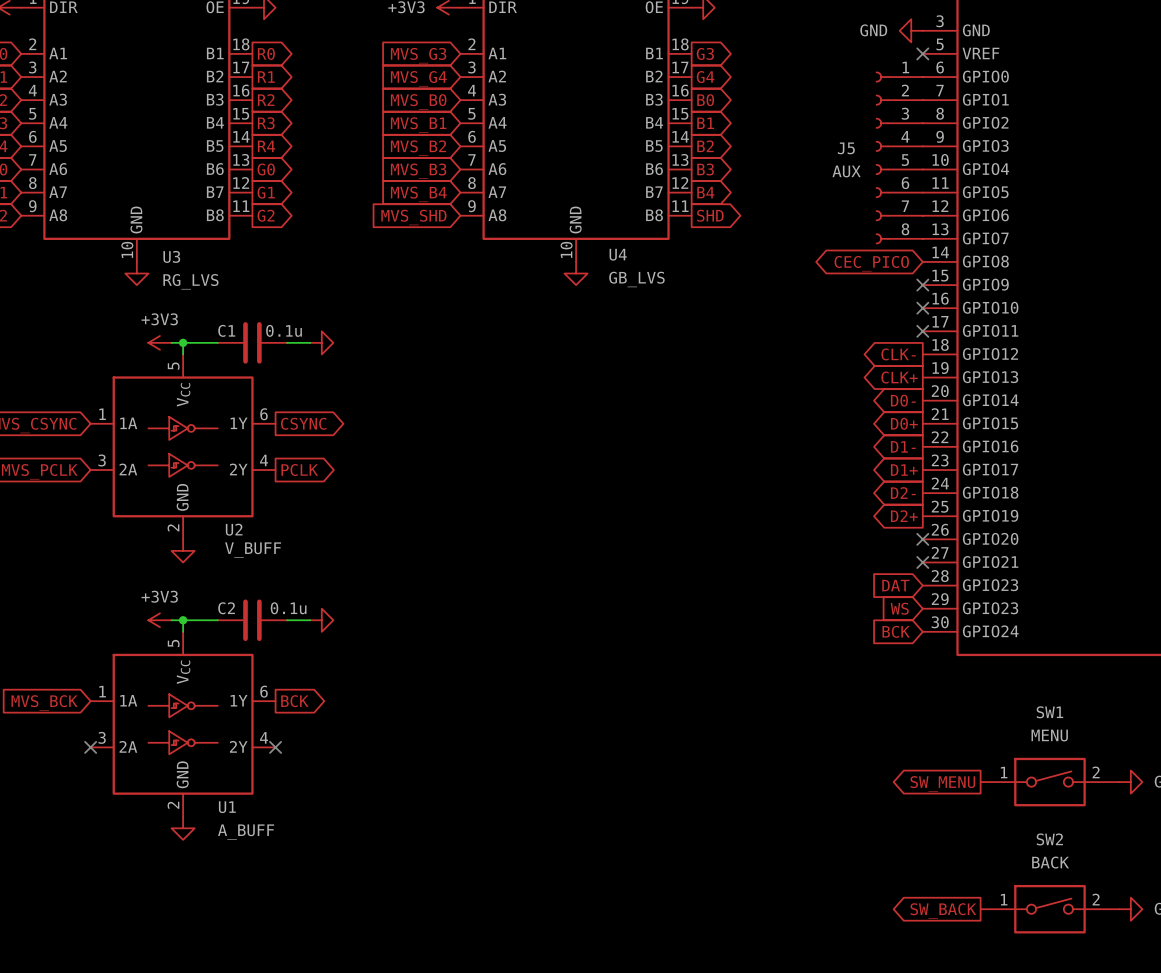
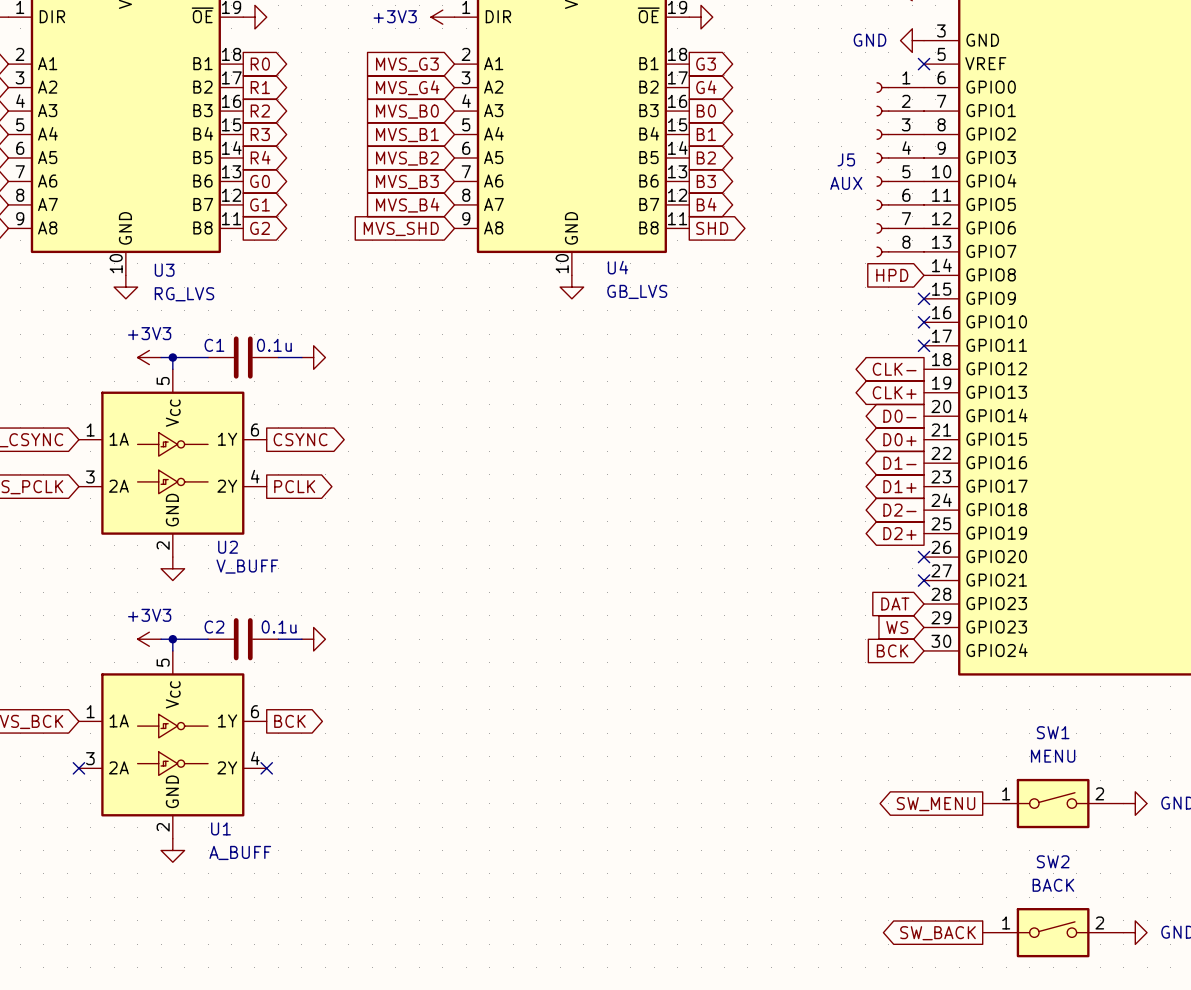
global label shape: bidirectional (871, 263) -> input (892, 275)
global label: CEC_PICO (871, 263) -> HPD (892, 275)

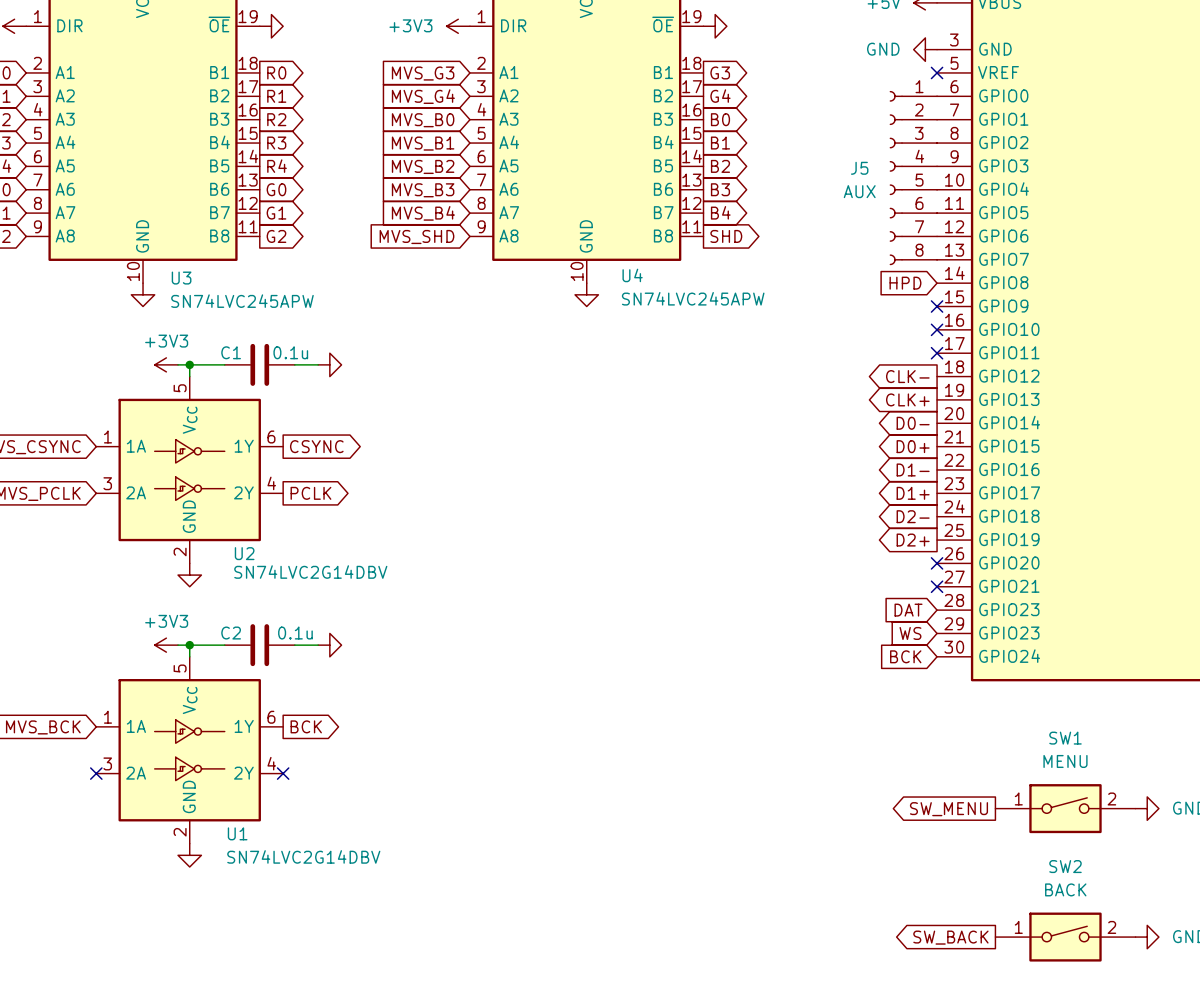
U4 value: GB_LVS (637, 291) -> SN74LVC245APW (693, 298)
U3 value: RG_LVS (184, 294) -> SN74LVC245APW (242, 301)
U2 value: V_BUFF (247, 566) -> SN74LVC2G14DBV (310, 572)
U1 value: A_BUFF (240, 852) -> SN74LVC2G14DBV (303, 856)

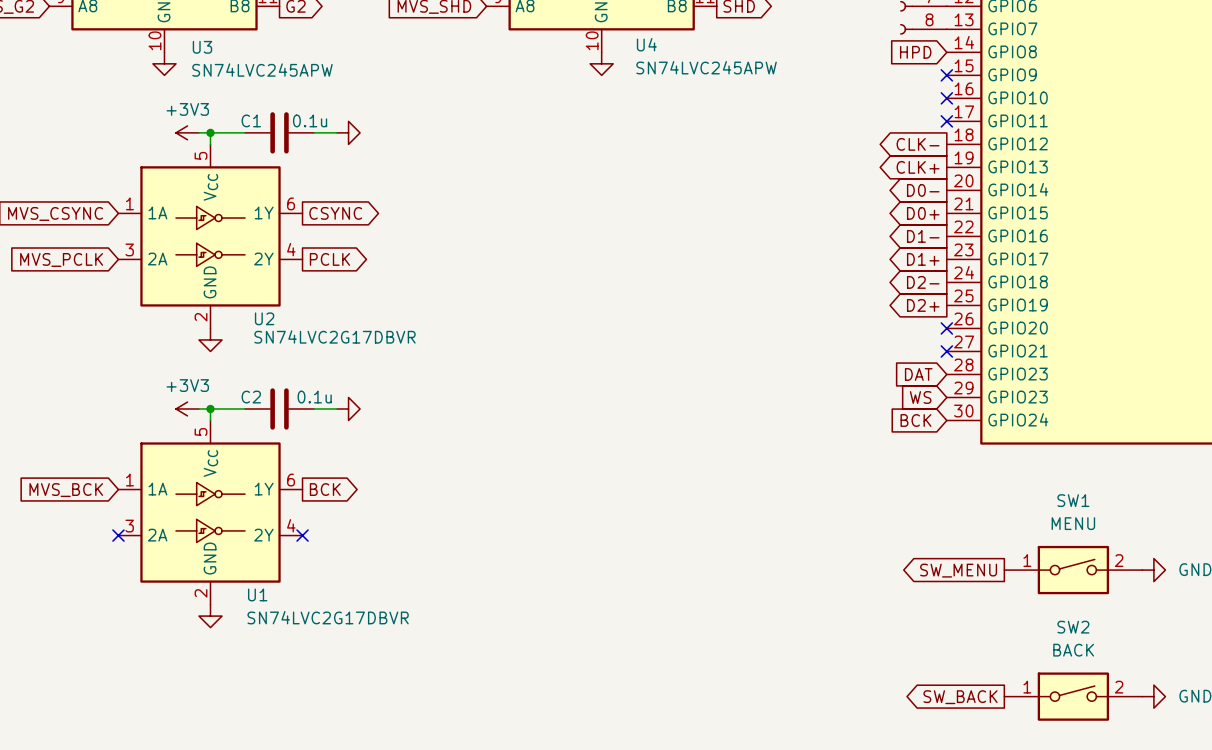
U2 value: SN74LVC2G14DBV (310, 572) -> SN74LVC2G17DBVR (335, 336)
U1 value: SN74LVC2G14DBV (303, 856) -> SN74LVC2G17DBVR (328, 617)

